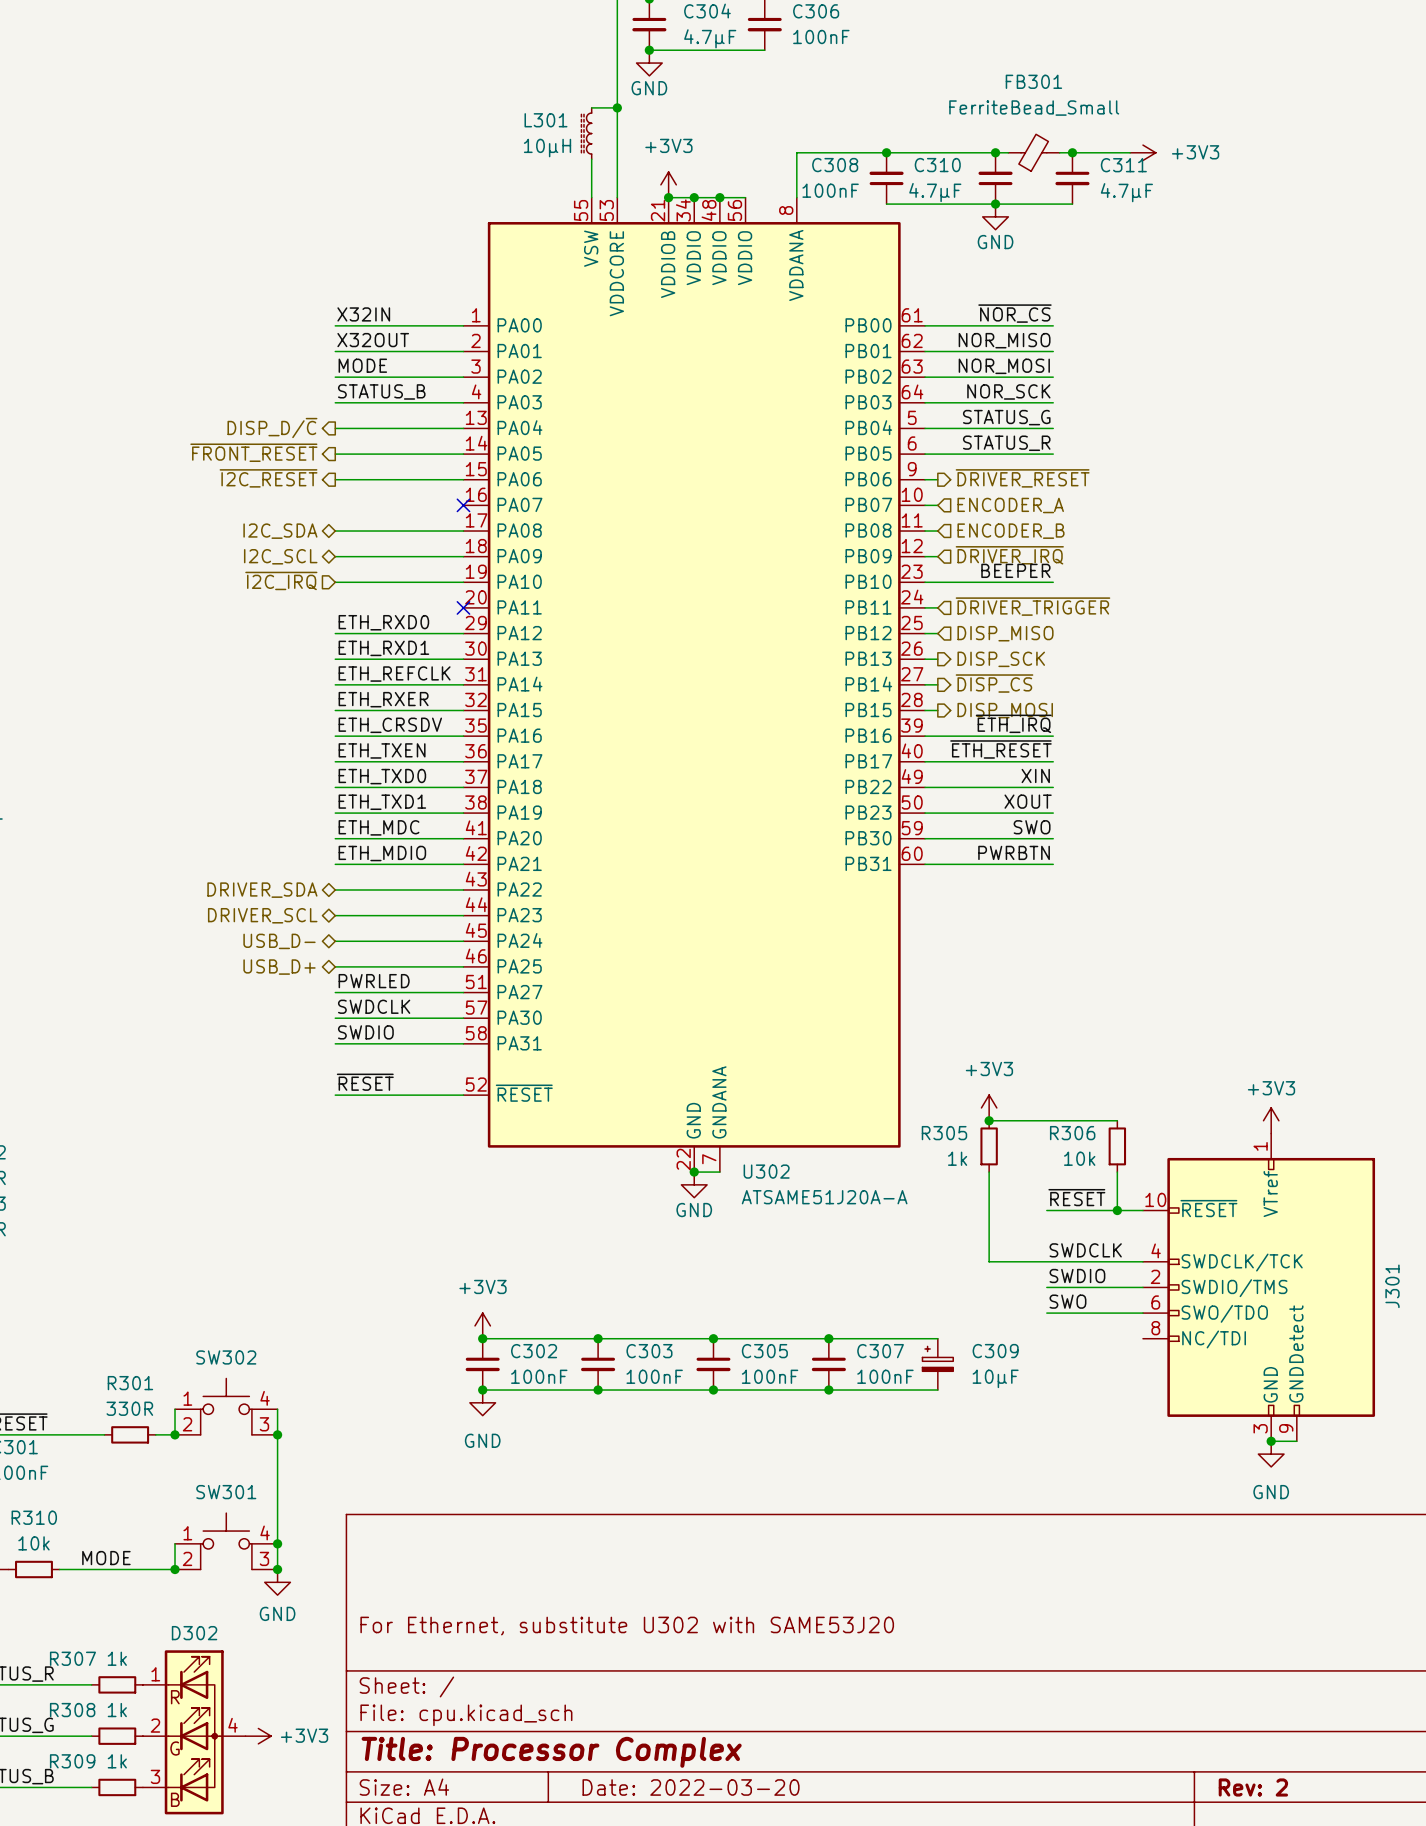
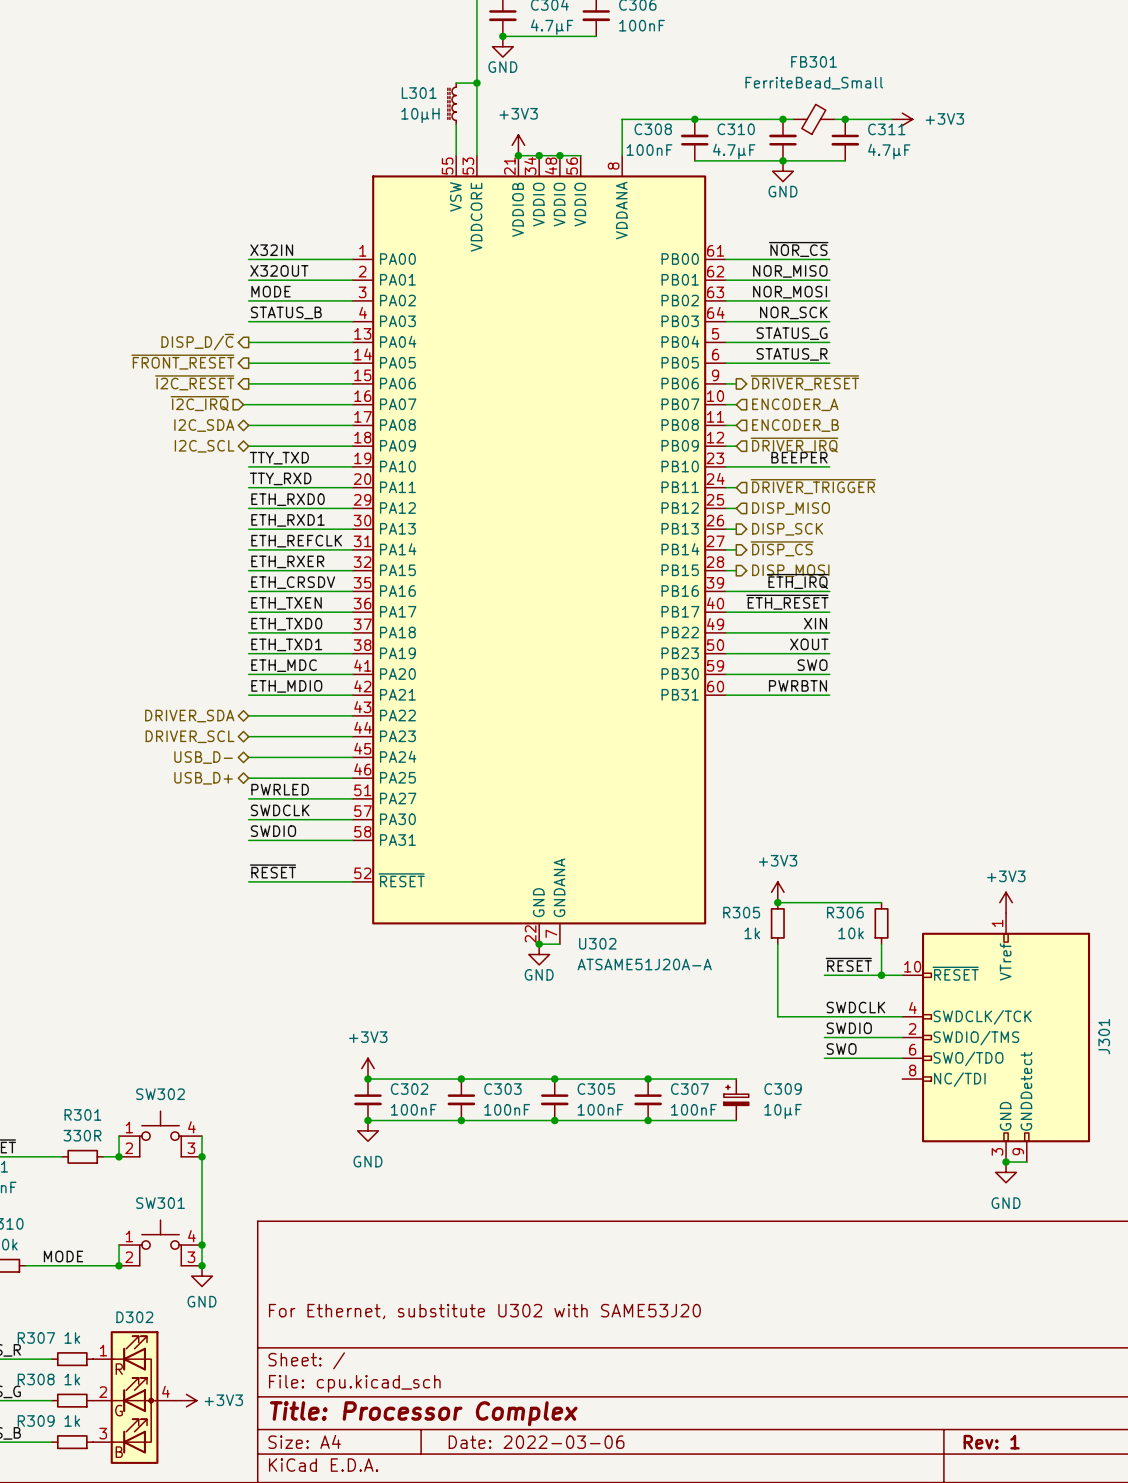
wire: none -> (243, 404) (352, 404)
no-connect mark: (463, 505) -> none
label: none -> TTY_TXD (279, 458)
hierarchical label position: ~{I2C_IRQ} (281, 580) -> ~{I2C_IRQ} (199, 403)
label: none -> TTY_RXD (280, 478)
wire: none -> (248, 487) (352, 487)
no-connect mark: (463, 607) -> none
title block: Date: 2022-03-20 (691, 1787) -> Date: 2022-03-06 (536, 1442)
title block: Rev: 2 (1253, 1787) -> Rev: 1 (991, 1442)

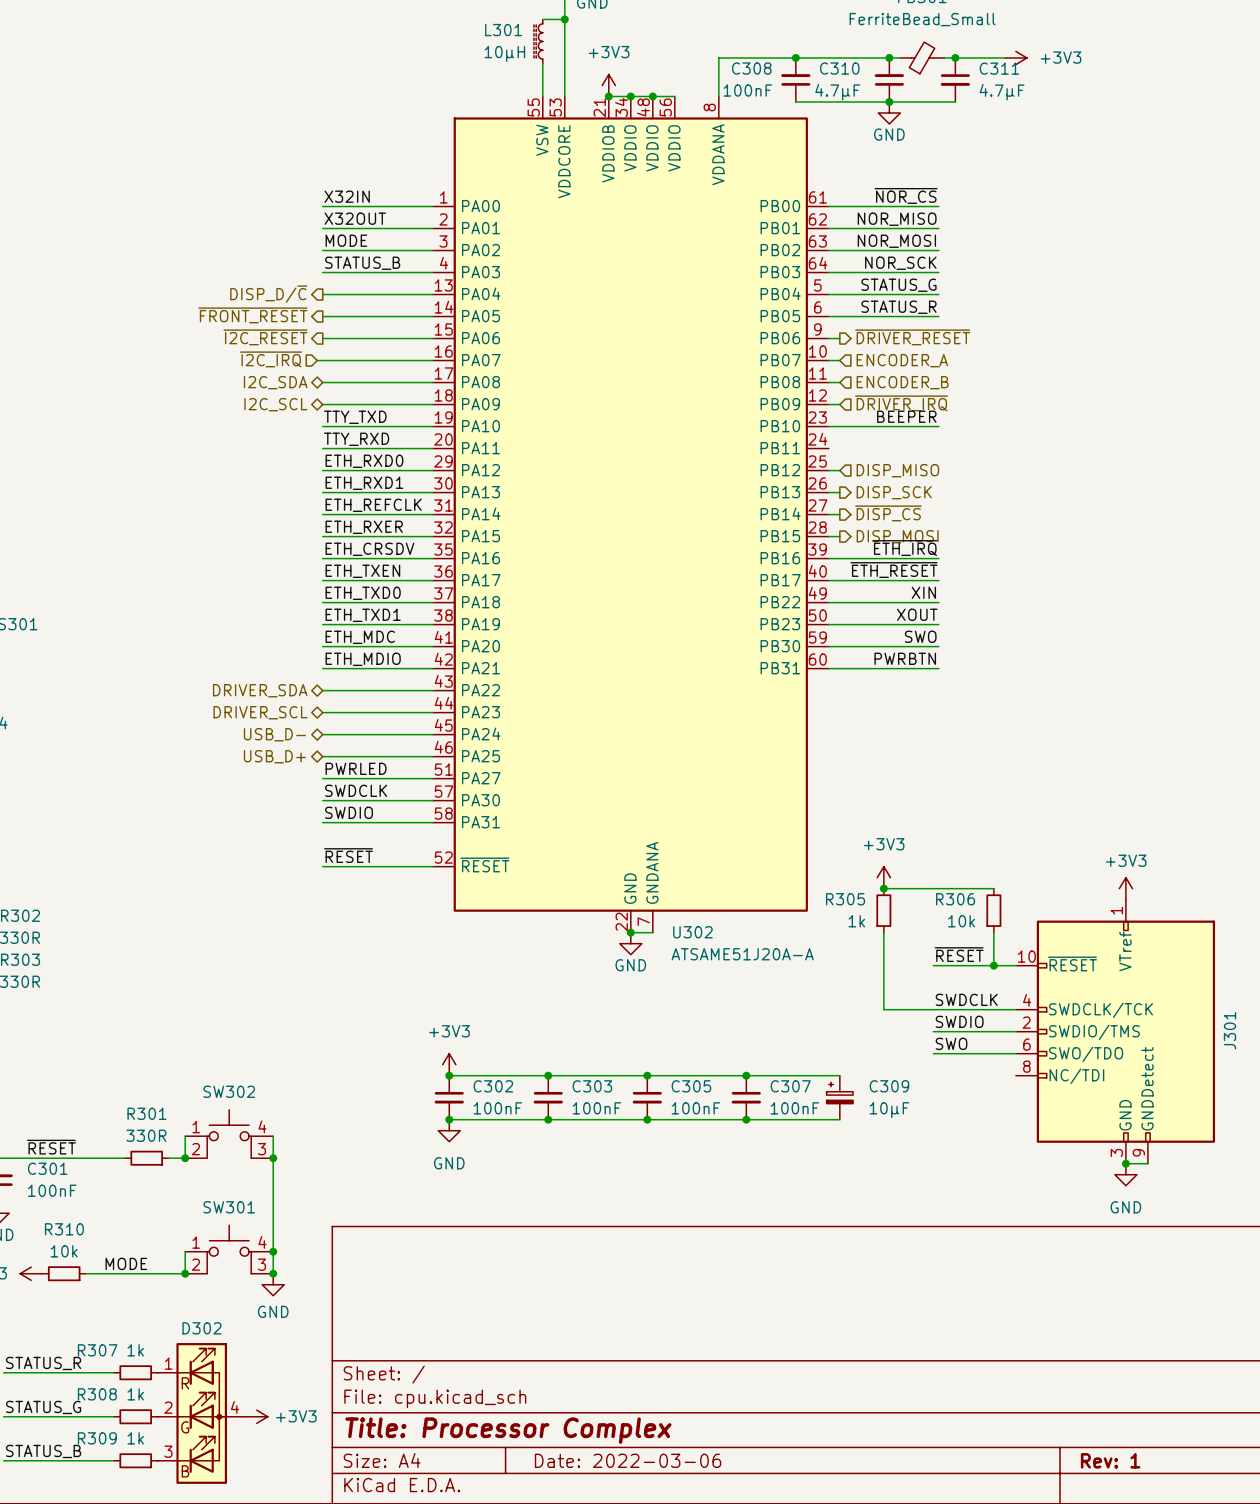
hierarchical label: ~{DRIVER_TRIGGER} (813, 486) -> none
wire: (725, 487) (736, 487) -> none
title block: For Ethernet, substitute U302 with SAME53J20 (484, 1311) -> none

